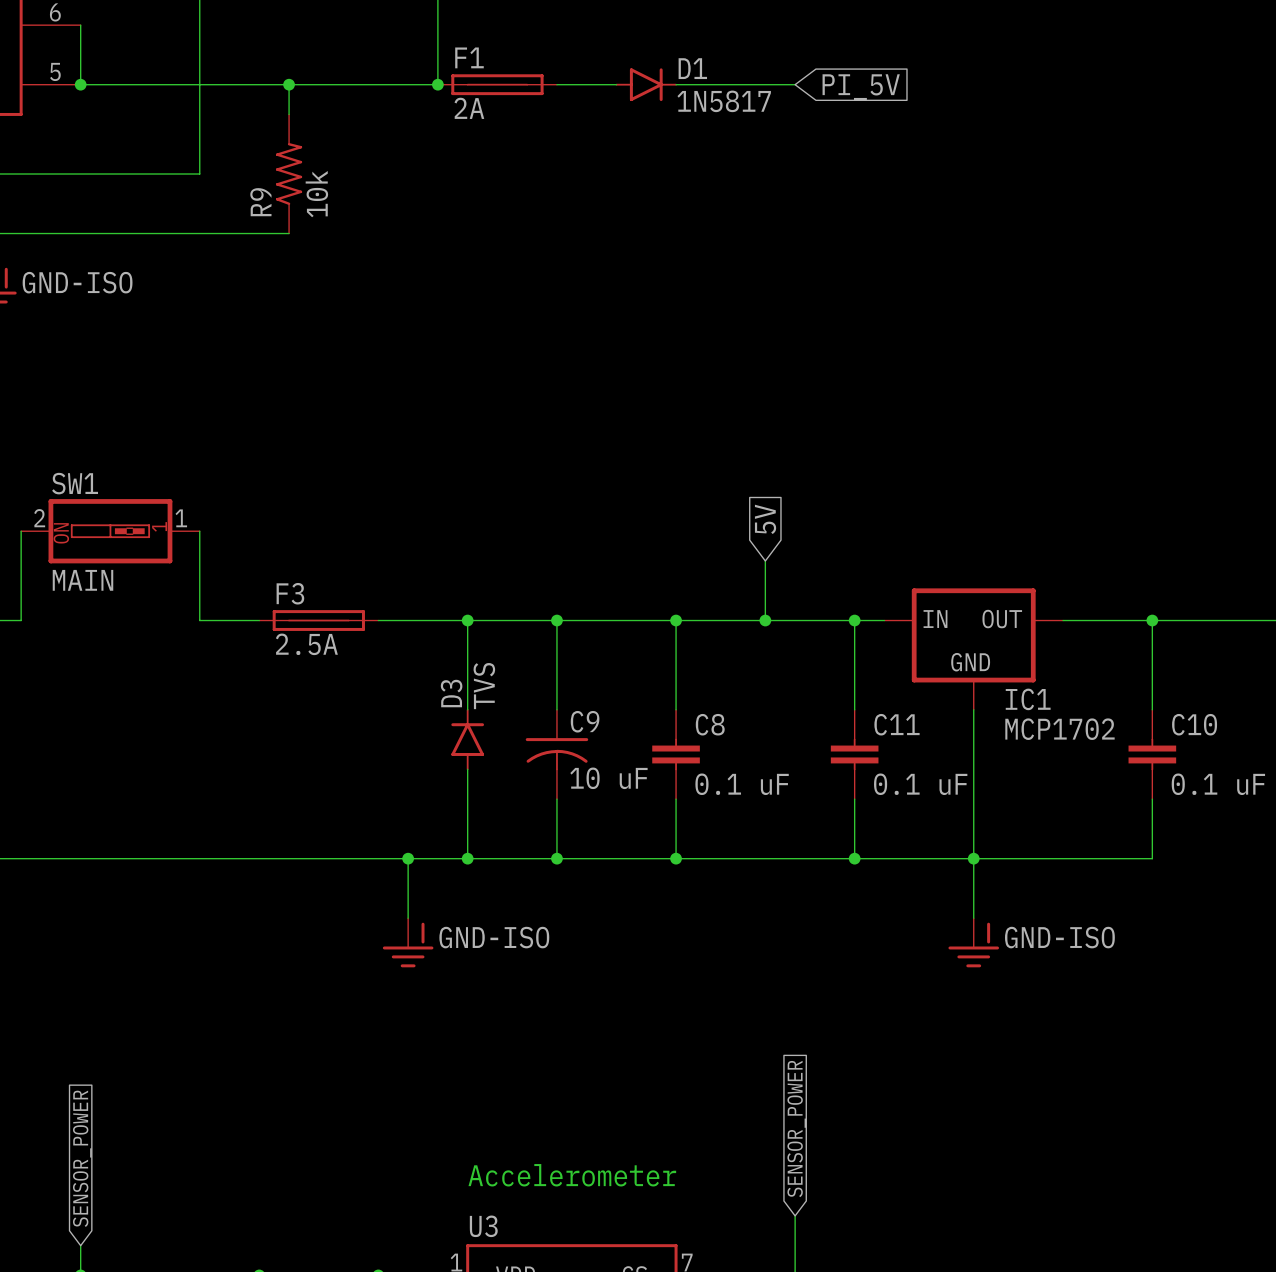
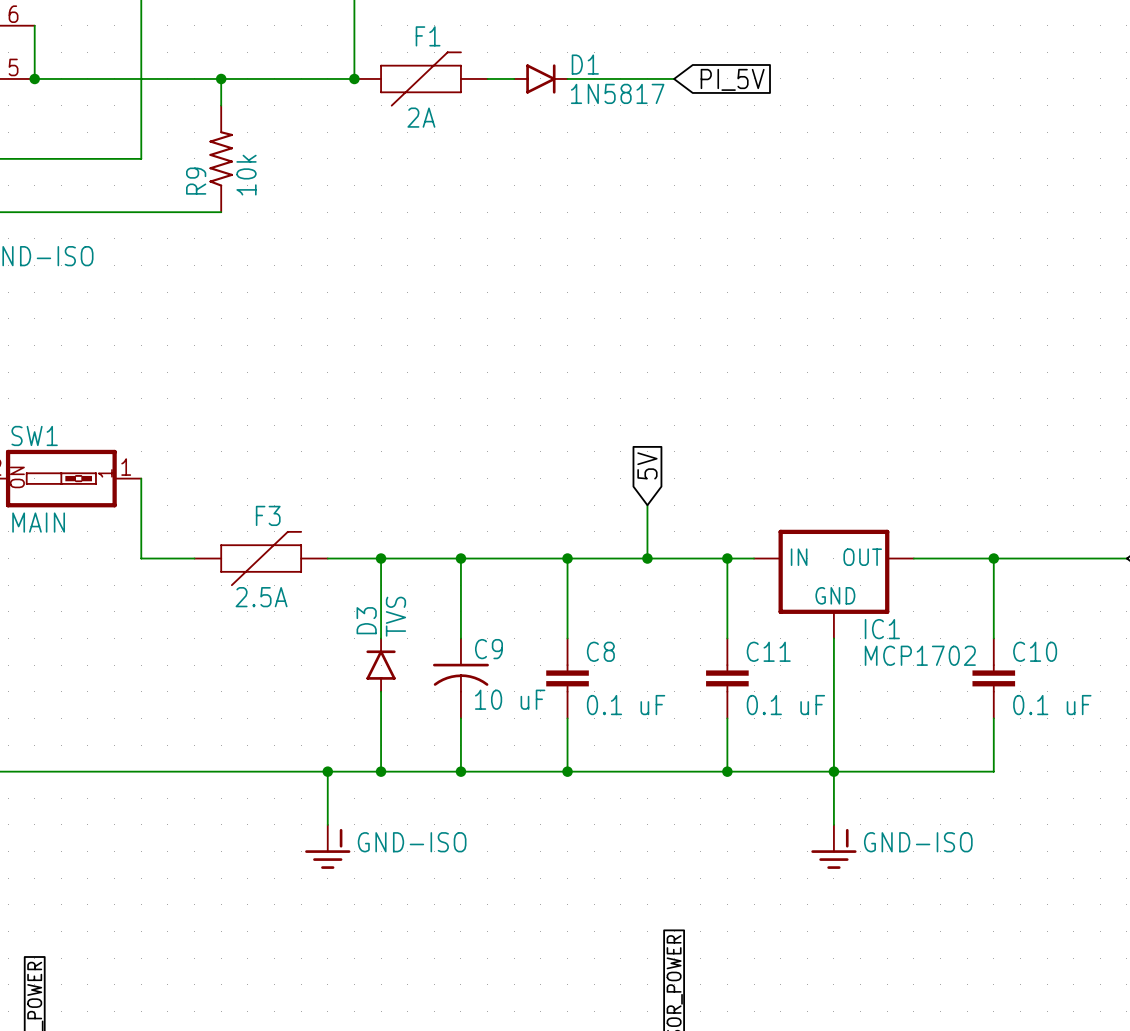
F1 name position: F1 (469, 57) -> F1 (428, 36)
F1 symbol: [437, 74, 557, 96] -> [354, 51, 488, 107]
F1 value position: 2A (469, 108) -> 2A (421, 117)
F3 name position: F3 (290, 593) -> F3 (268, 515)
F3 symbol: [259, 610, 379, 631] -> [194, 531, 328, 586]

